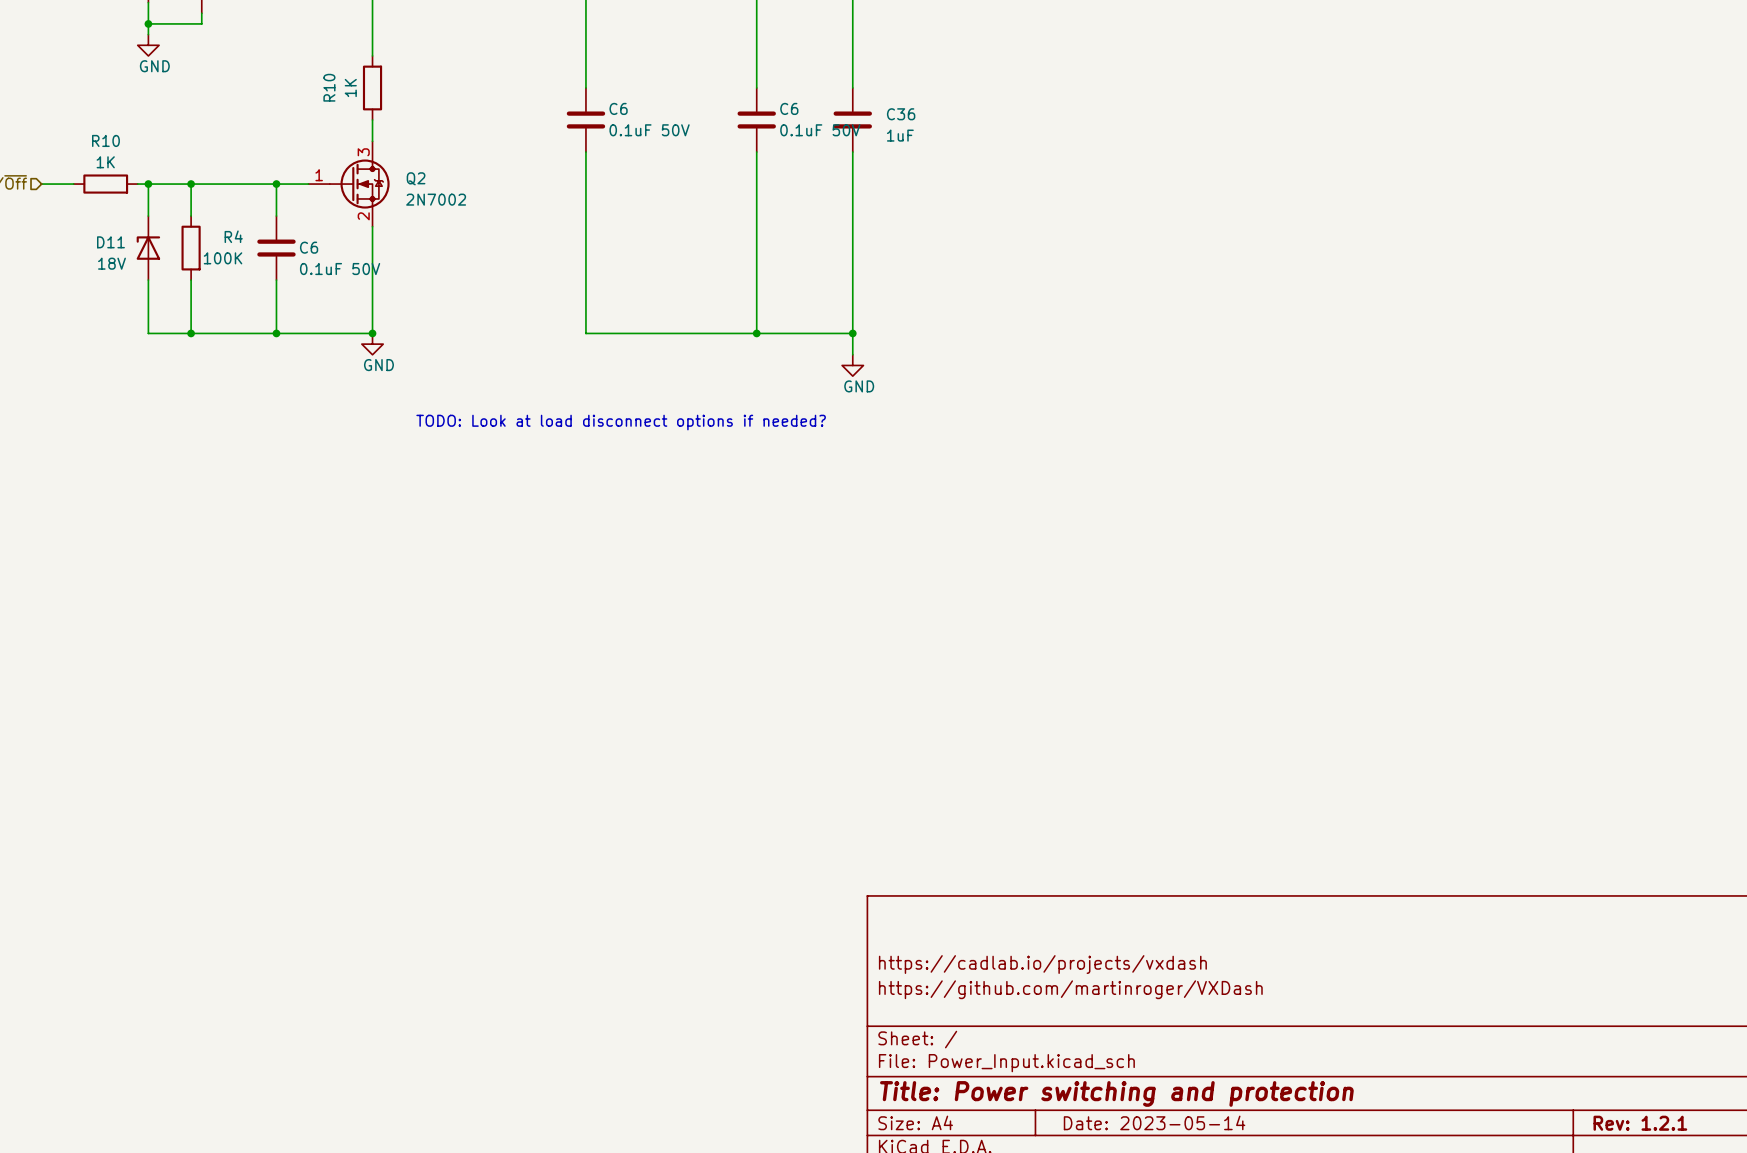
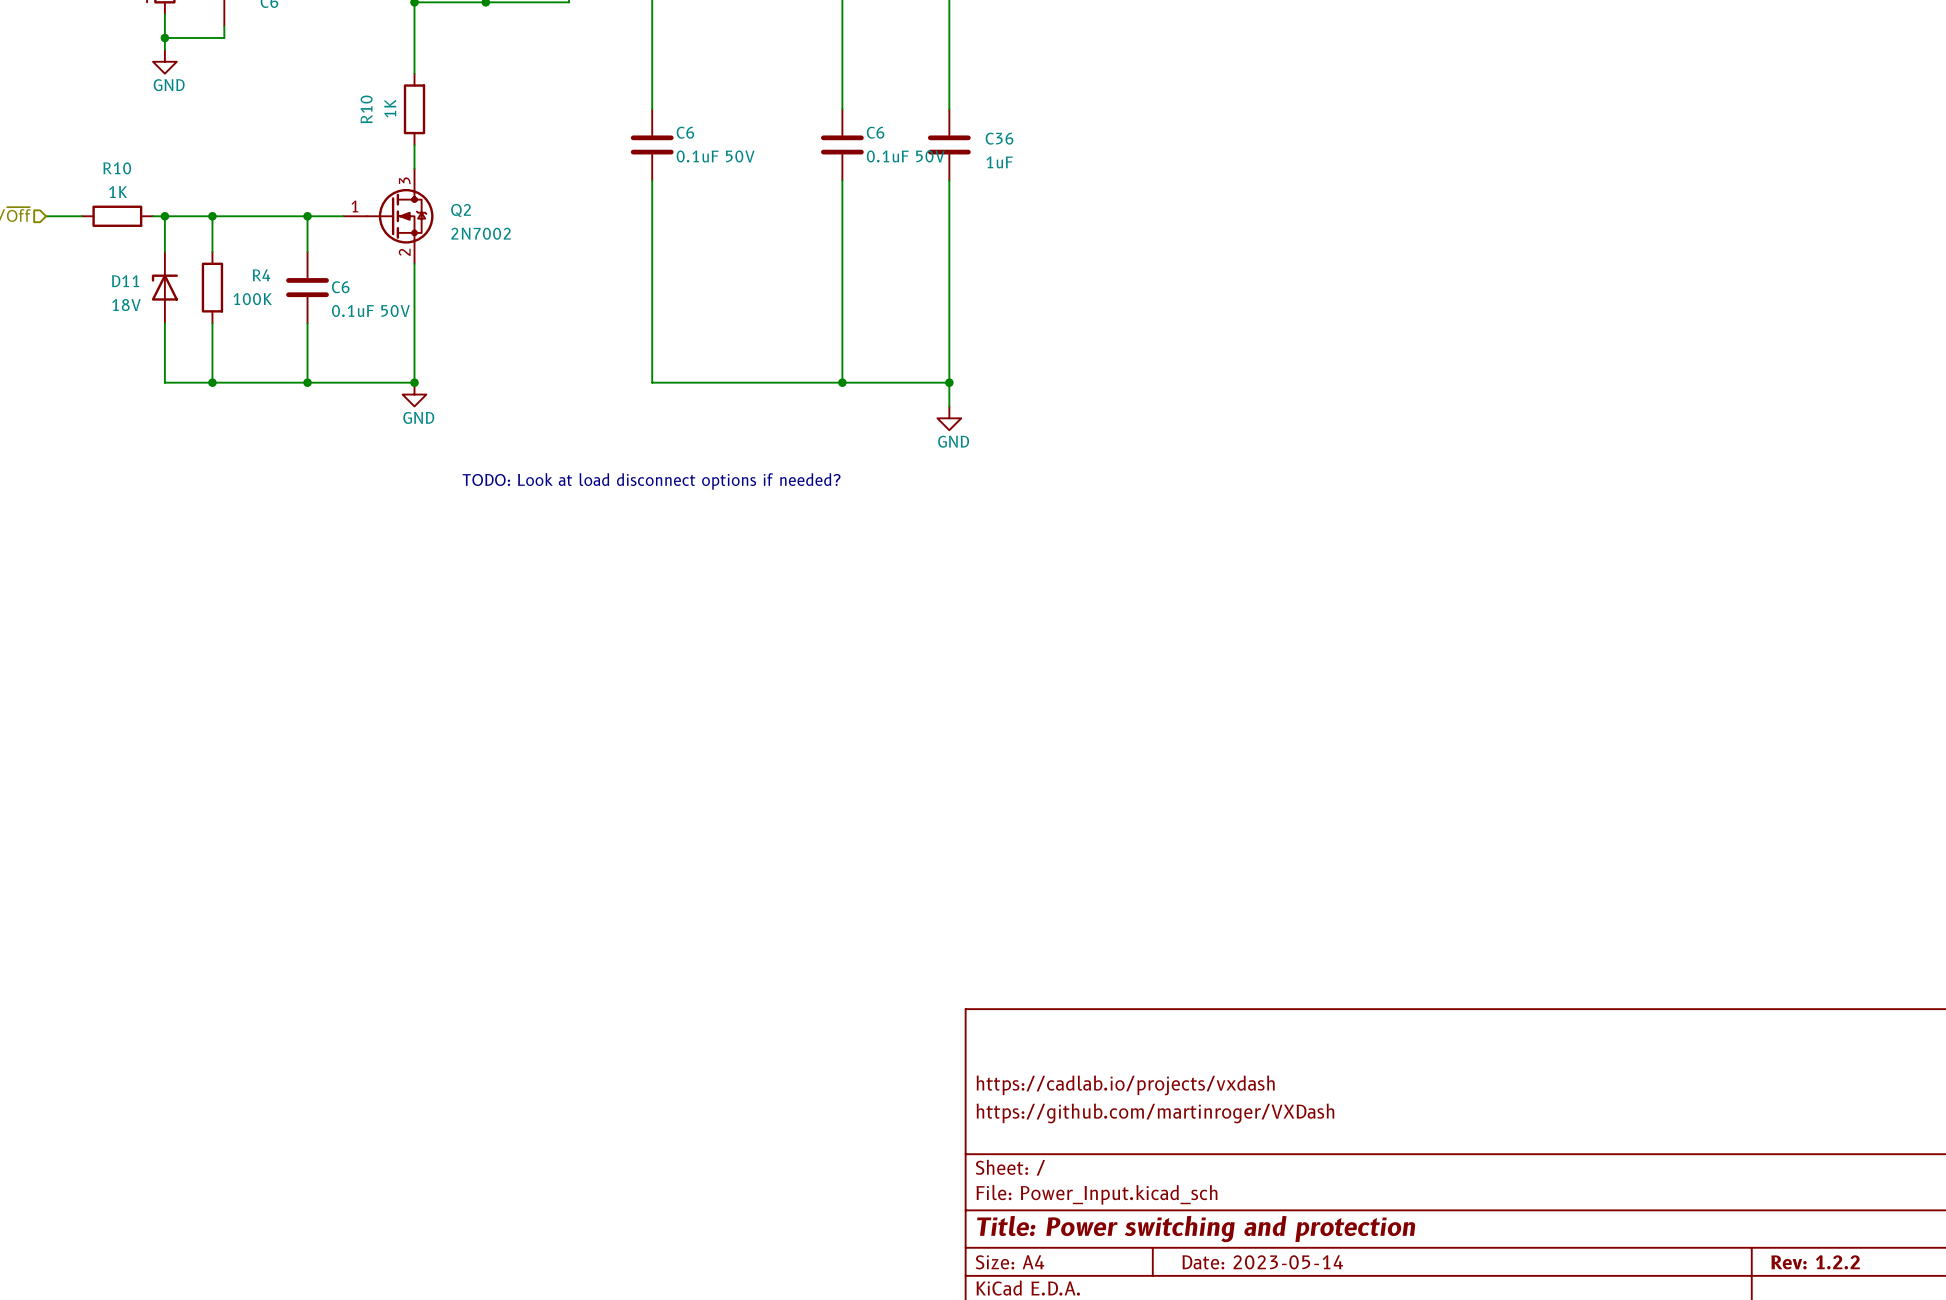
title block: Rev: 1.2.1 (1640, 1123) -> Rev: 1.2.2 (1815, 1262)

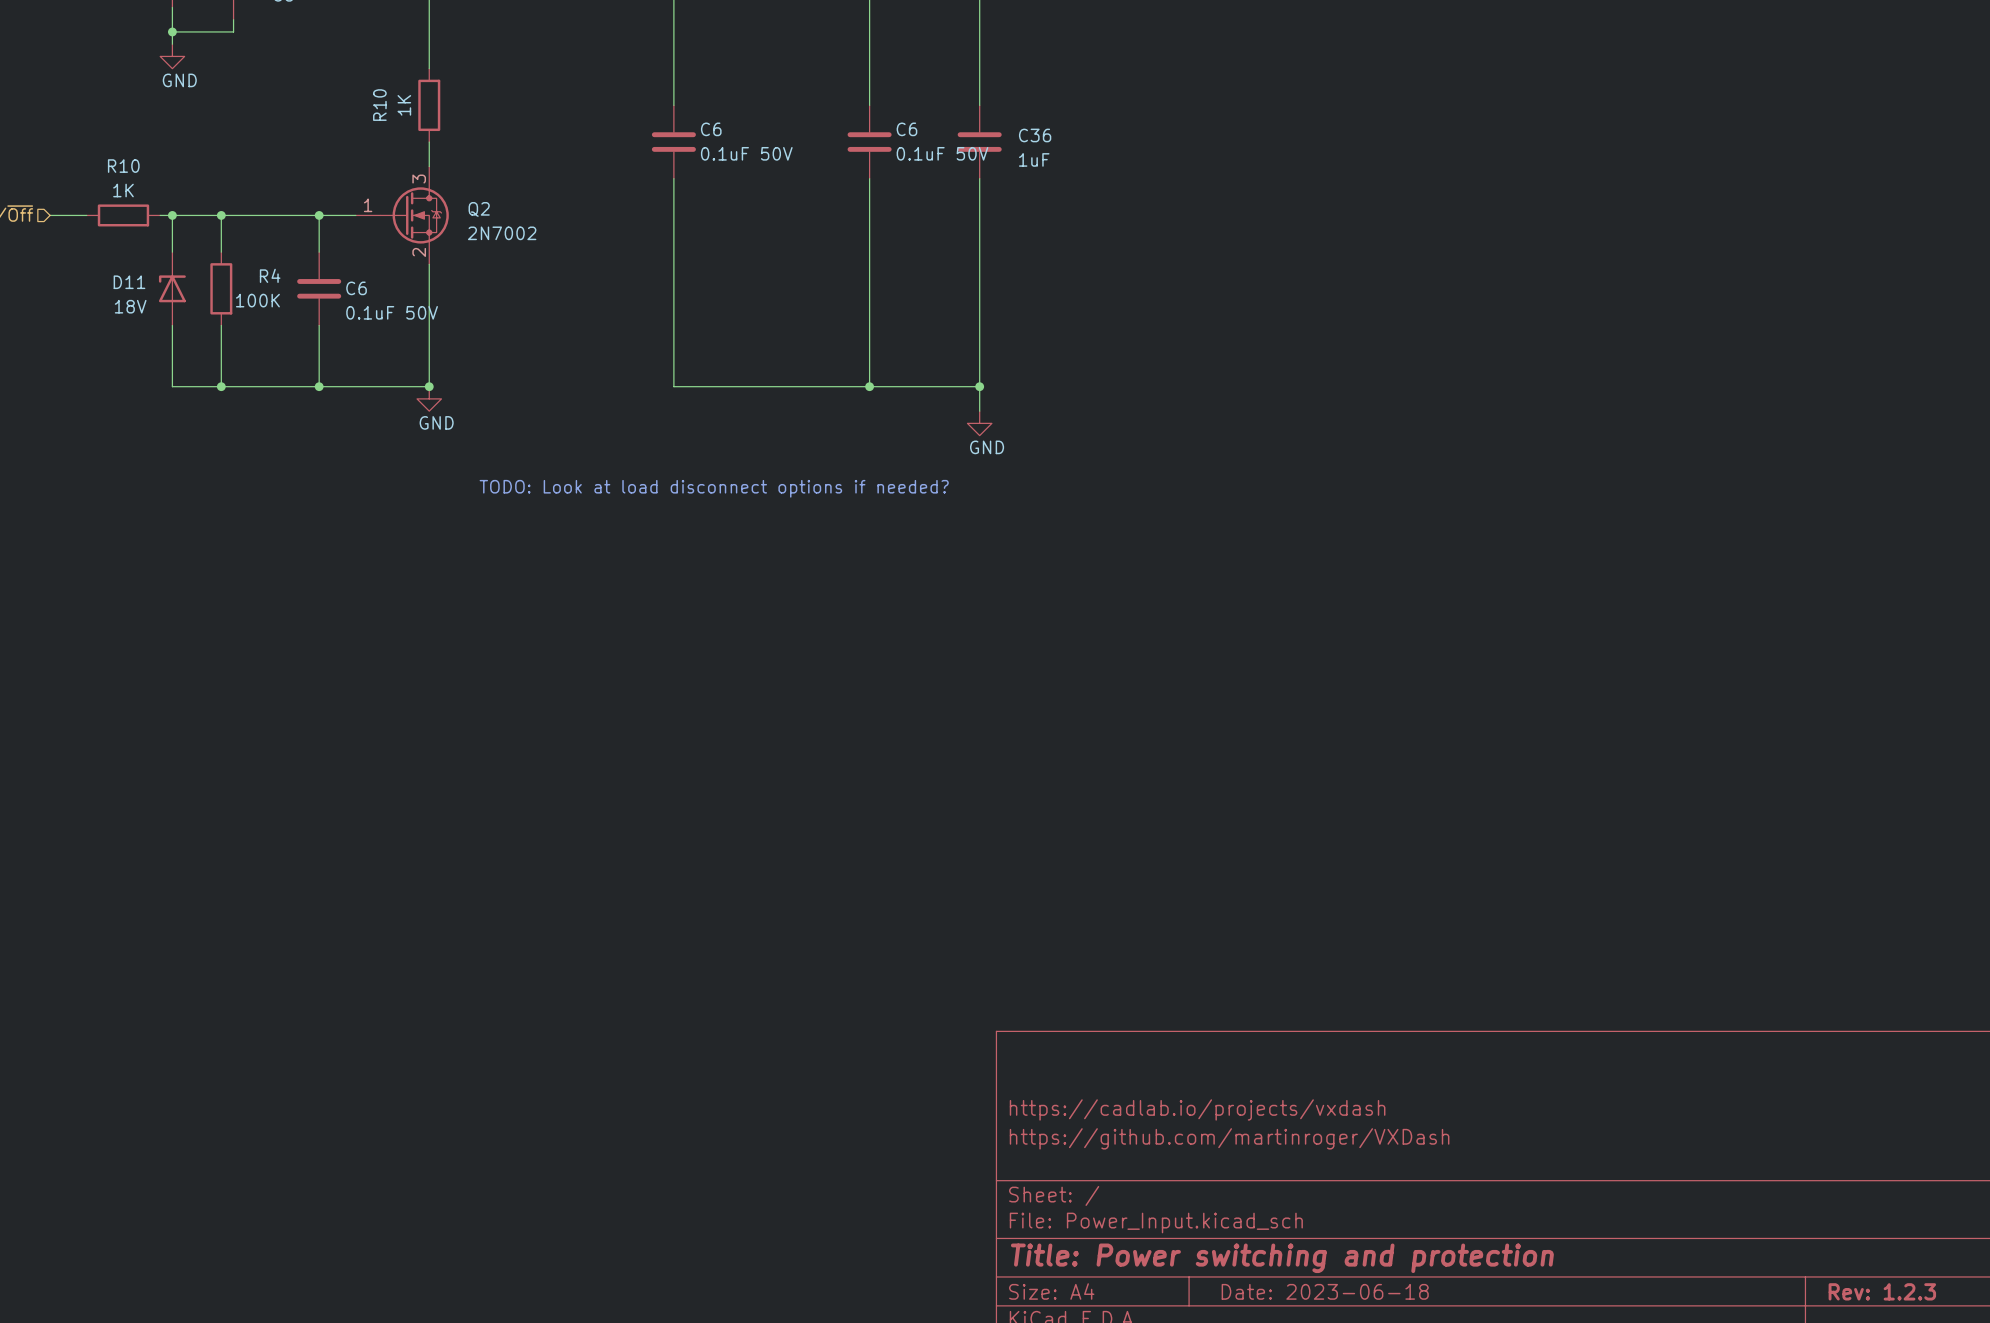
title block: Date: 2023-05-14 (1262, 1262) -> Date: 2023-06-18 (1325, 1291)
title block: Rev: 1.2.2 (1815, 1262) -> Rev: 1.2.3 (1882, 1291)

